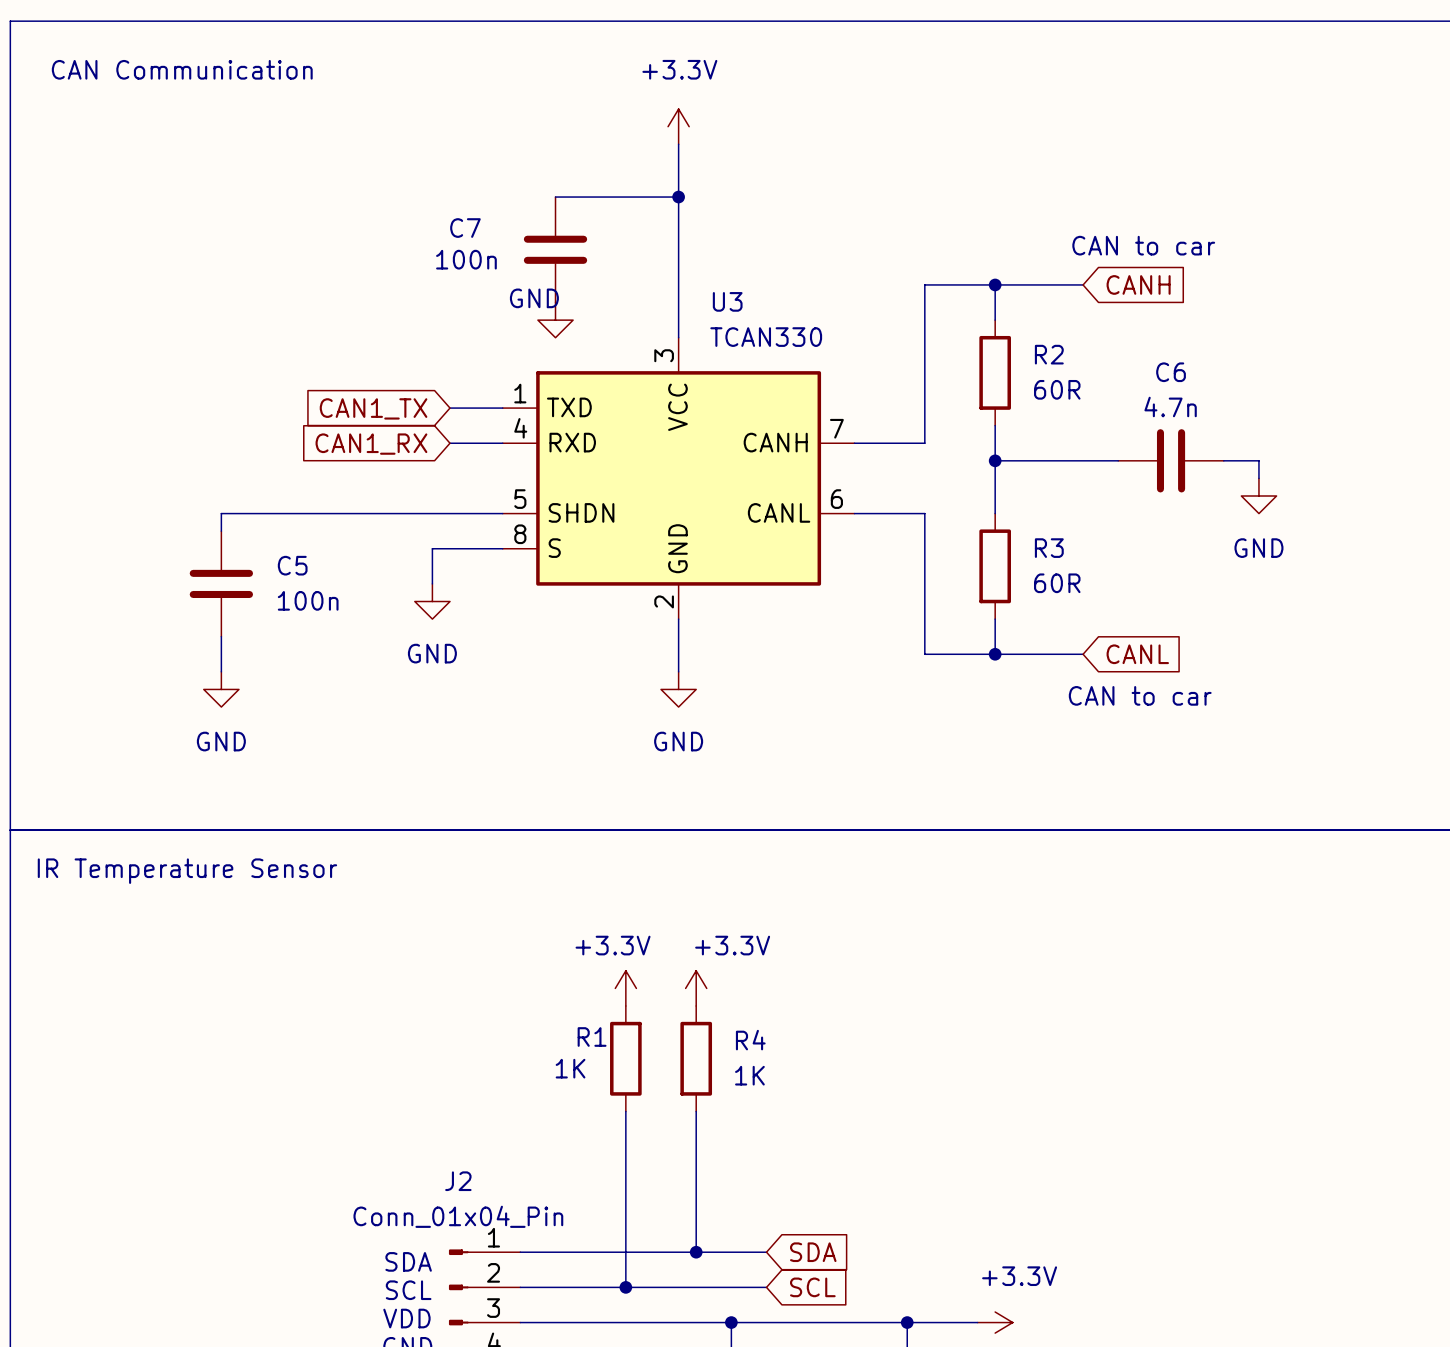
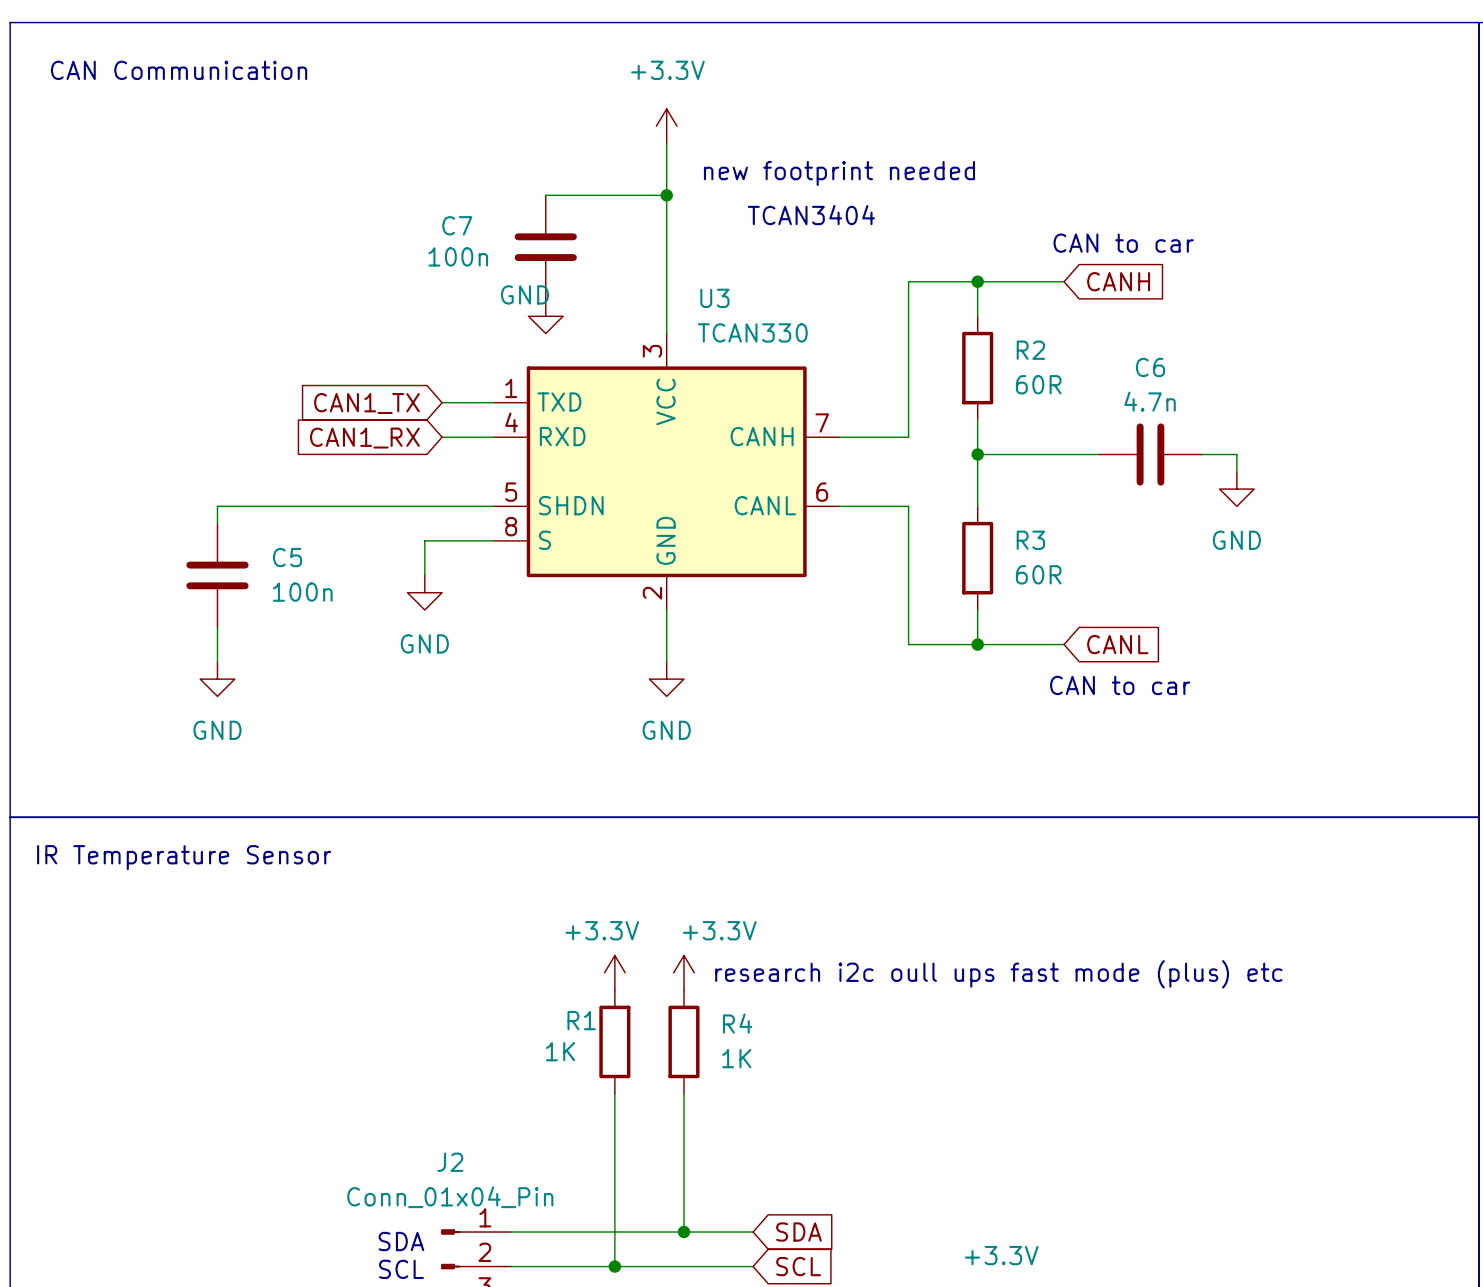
text: none -> new footprint needed (839, 173)
text: none -> TCAN3404 (811, 215)
text: none -> research i2c oull ups fast mode (plus) etc (998, 974)

